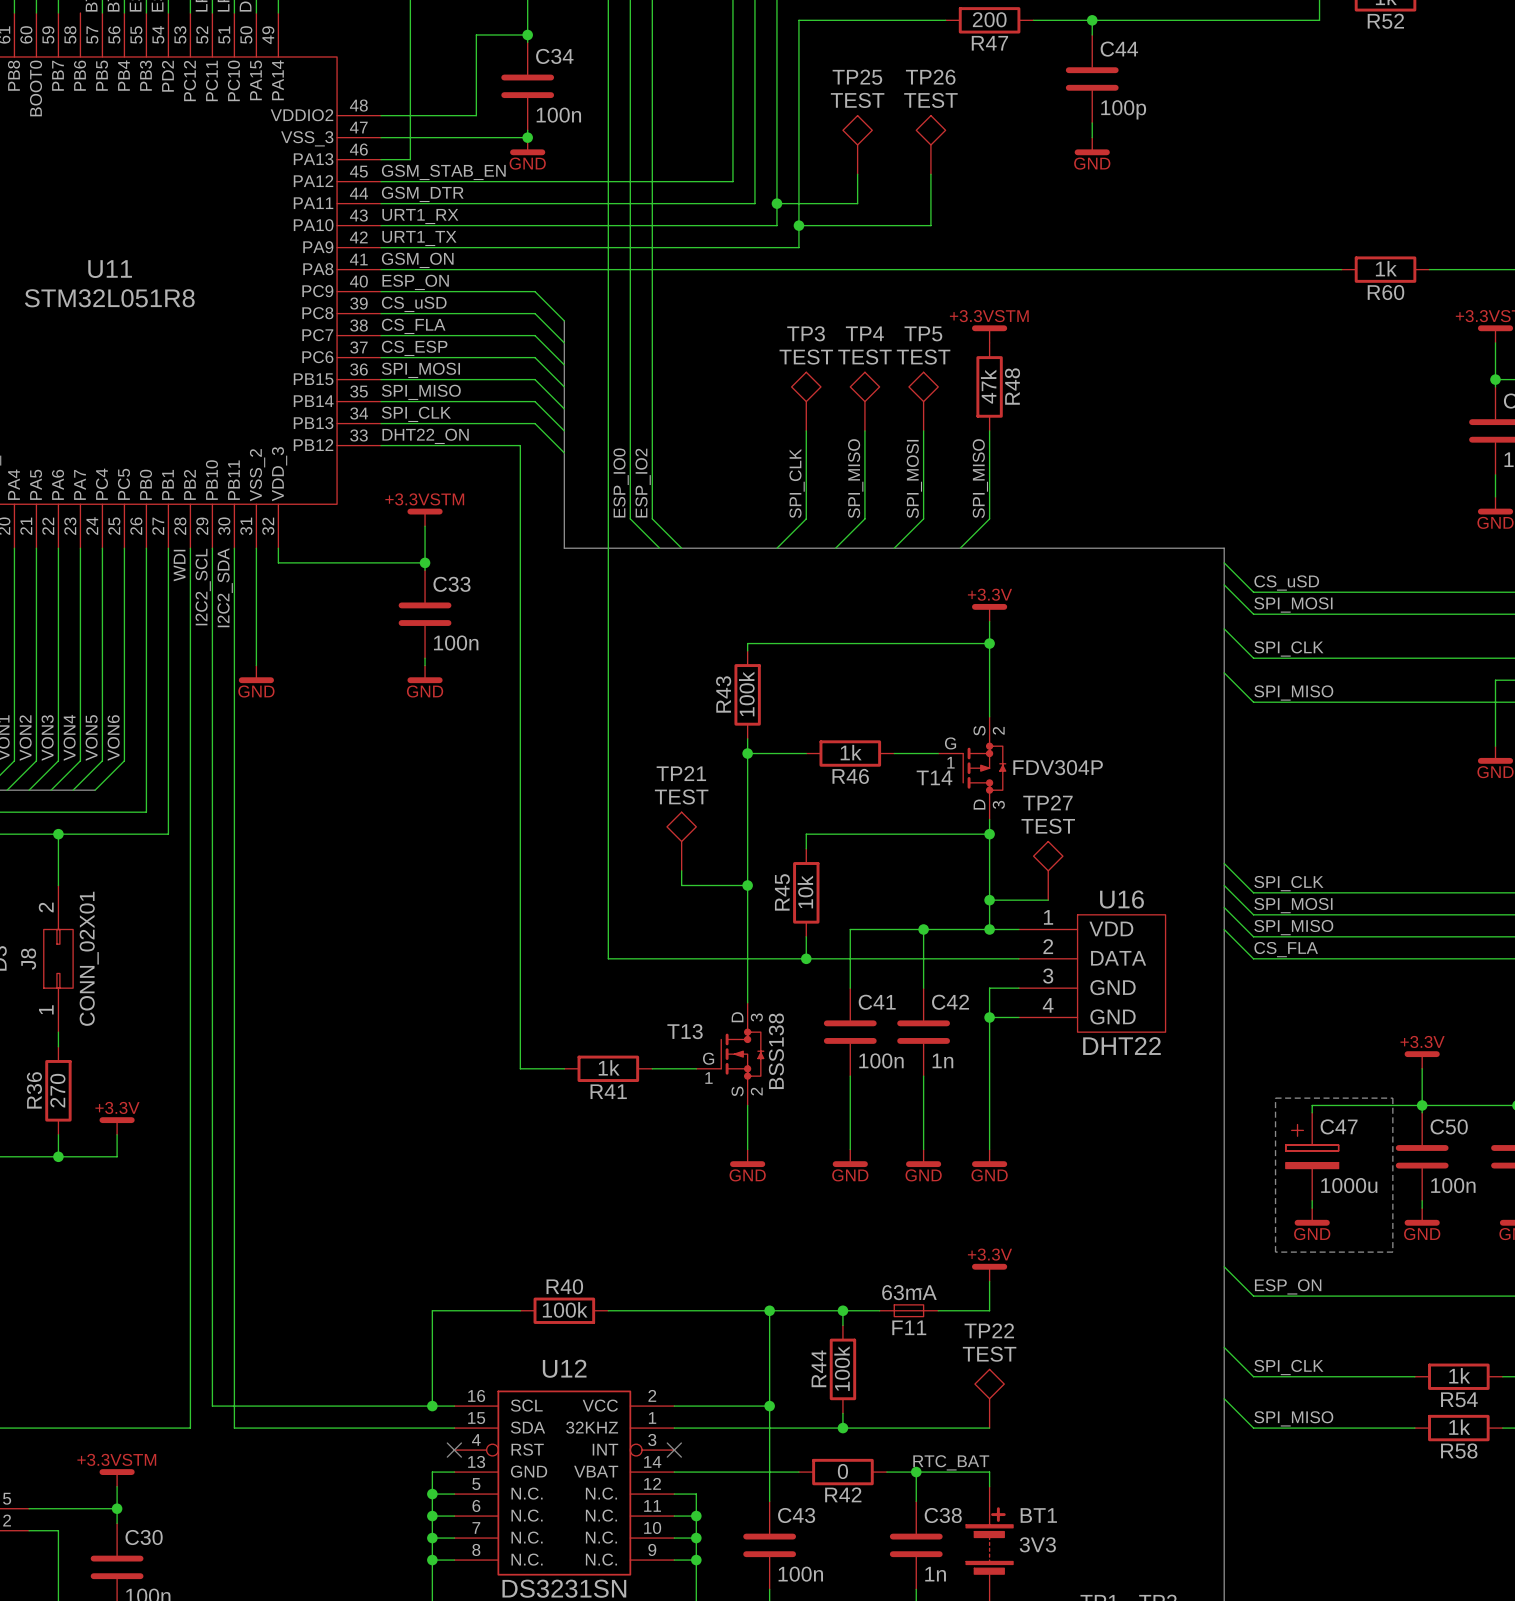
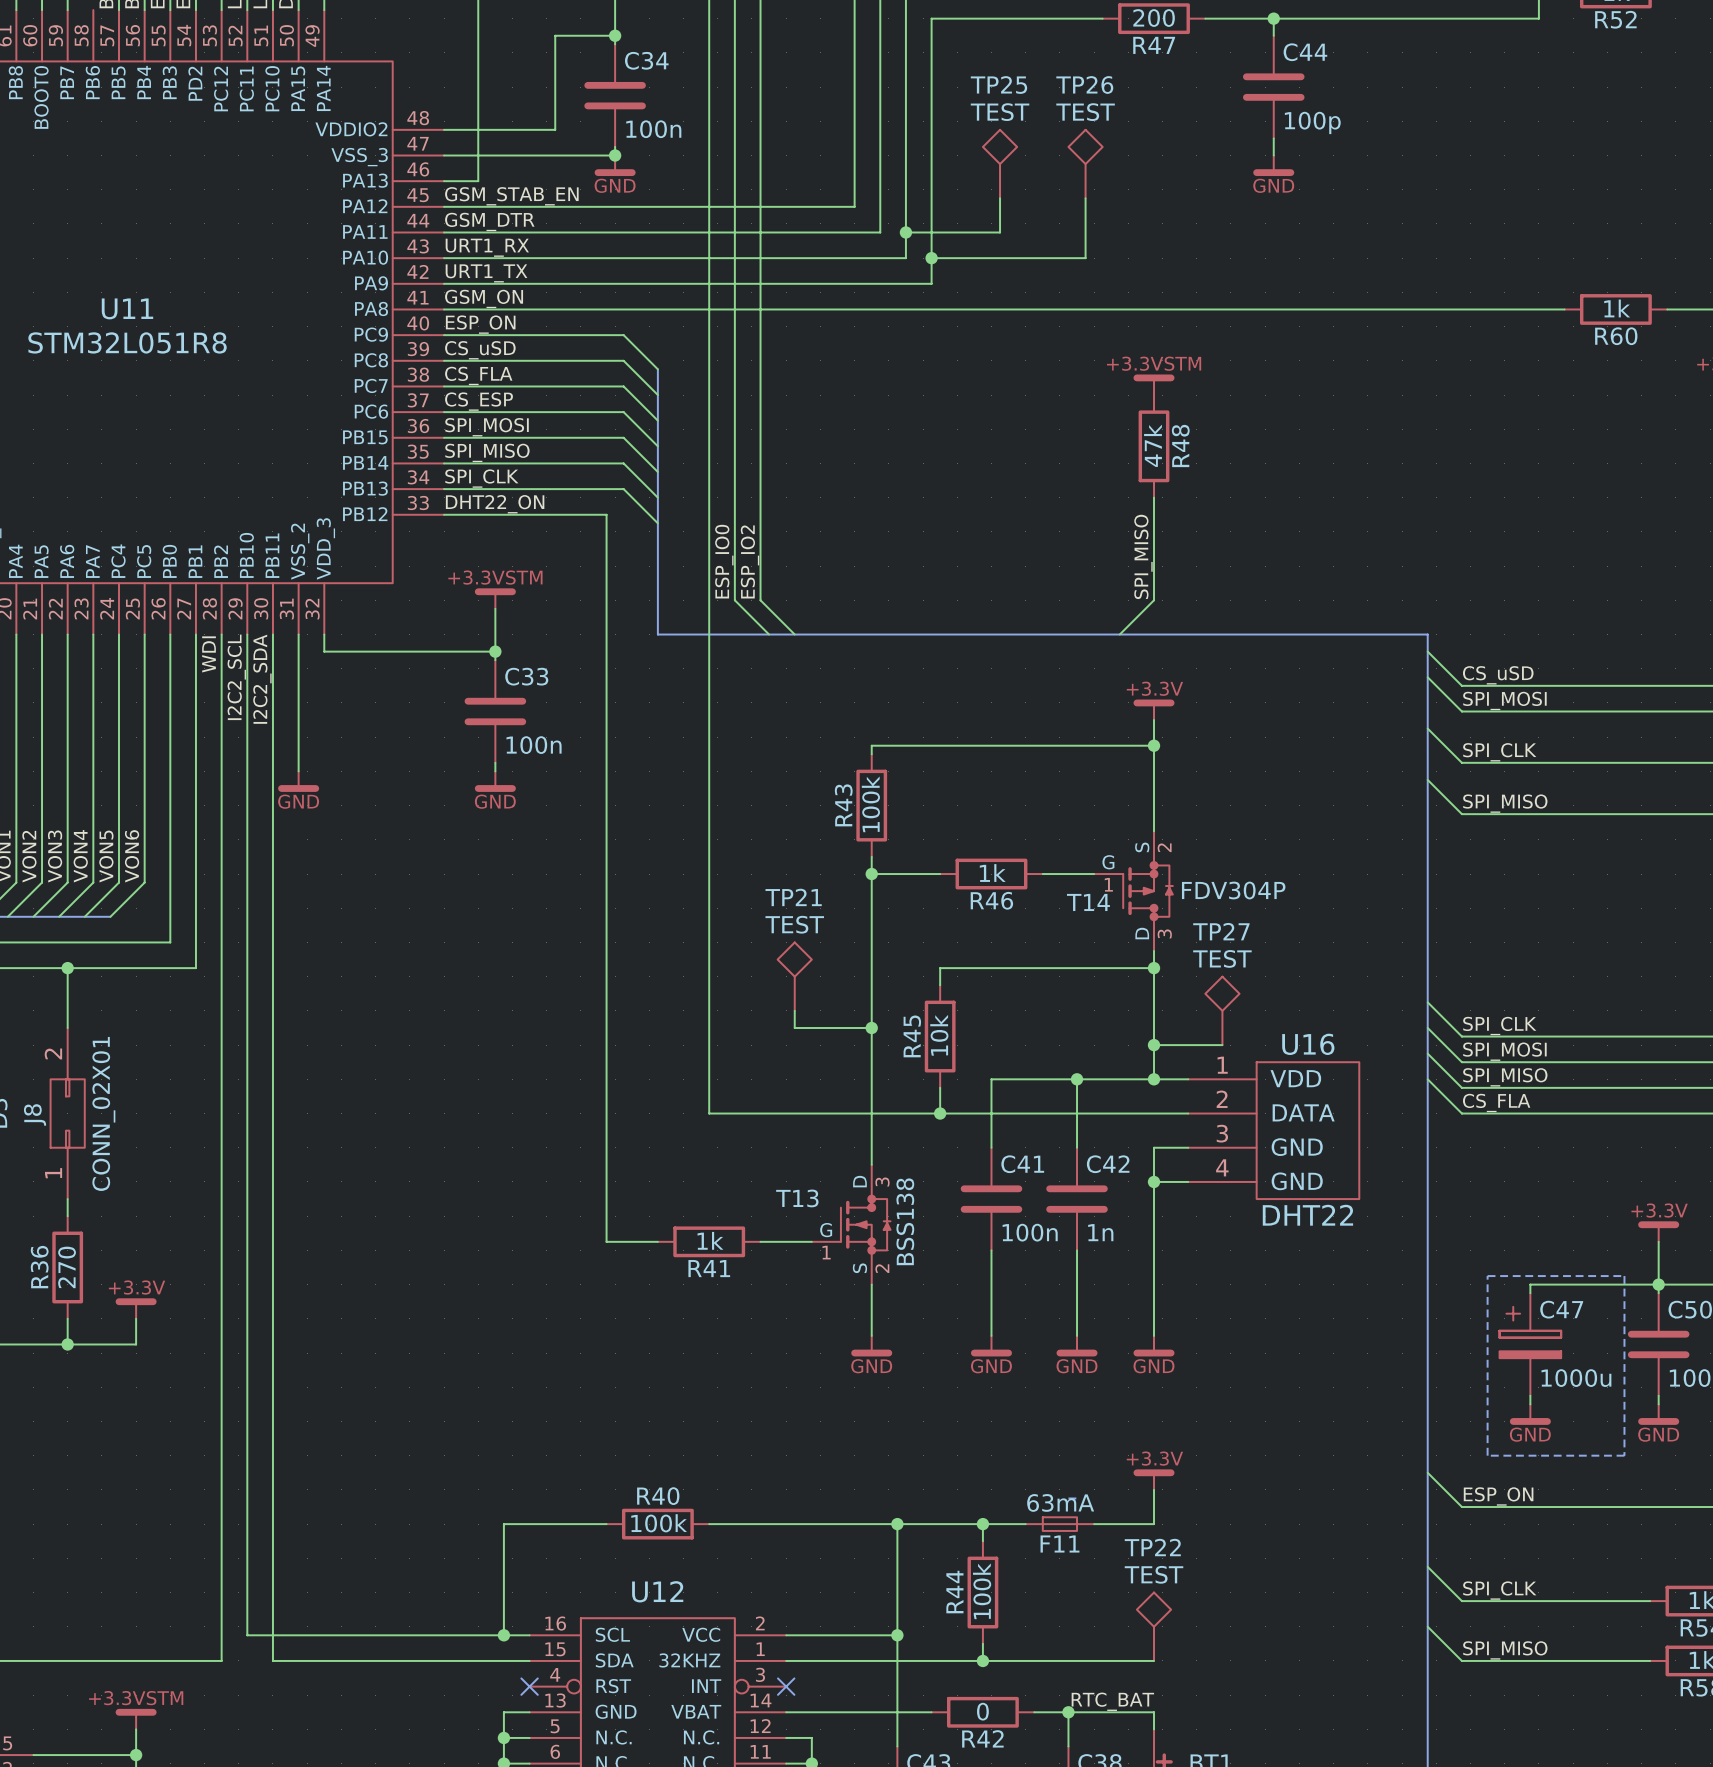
TP3: TEST (806, 401) -> none
TP4: TEST (864, 401) -> none
TP5: TEST (923, 401) -> none
wire: (806, 430) (806, 518) (776, 548) -> none
wire: (864, 430) (864, 518) (835, 548) -> none
wire: (923, 430) (923, 518) (894, 548) -> none
label: SPI_MISO (855, 478) -> none
label: SPI_MOSI (914, 479) -> none
label: SPI_CLK (797, 483) -> none

